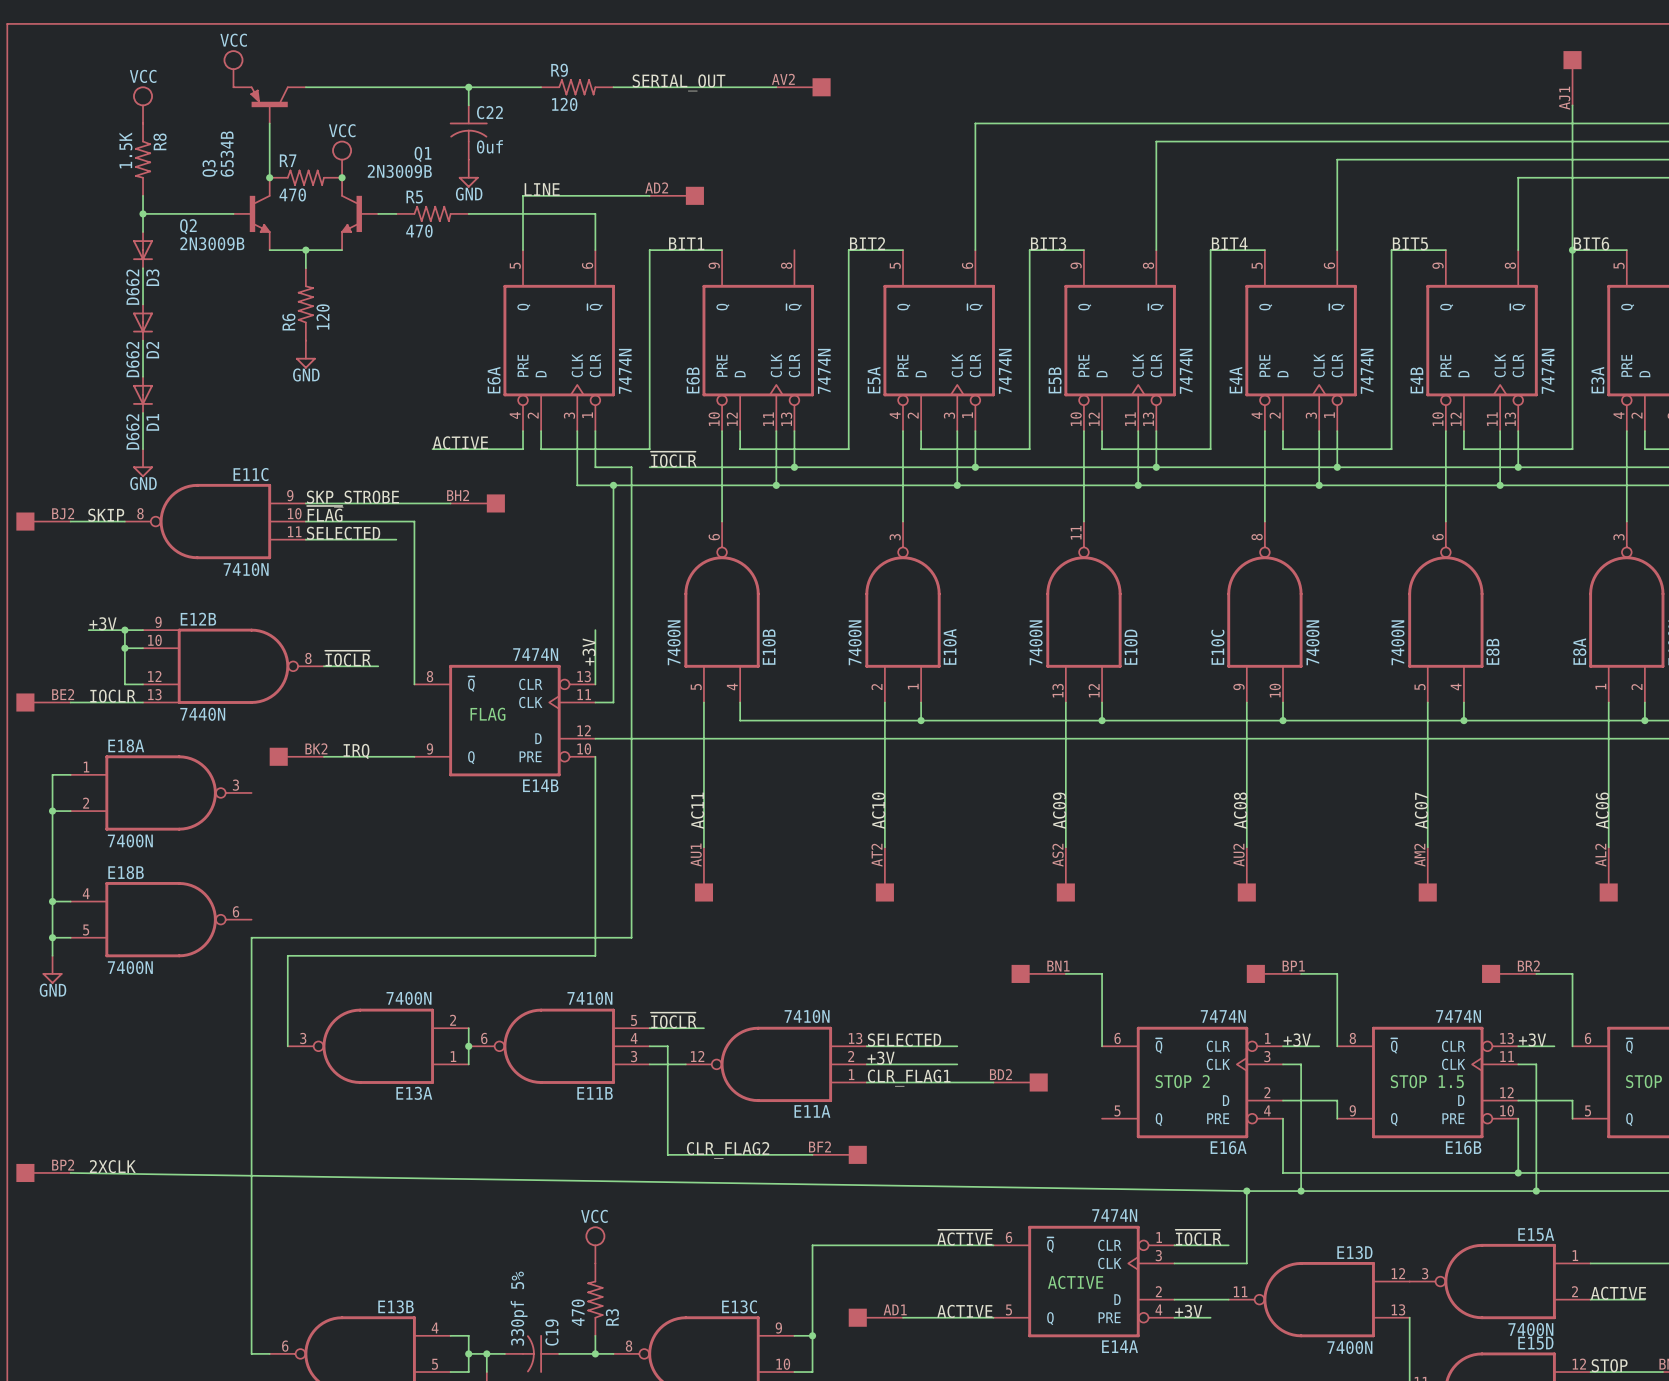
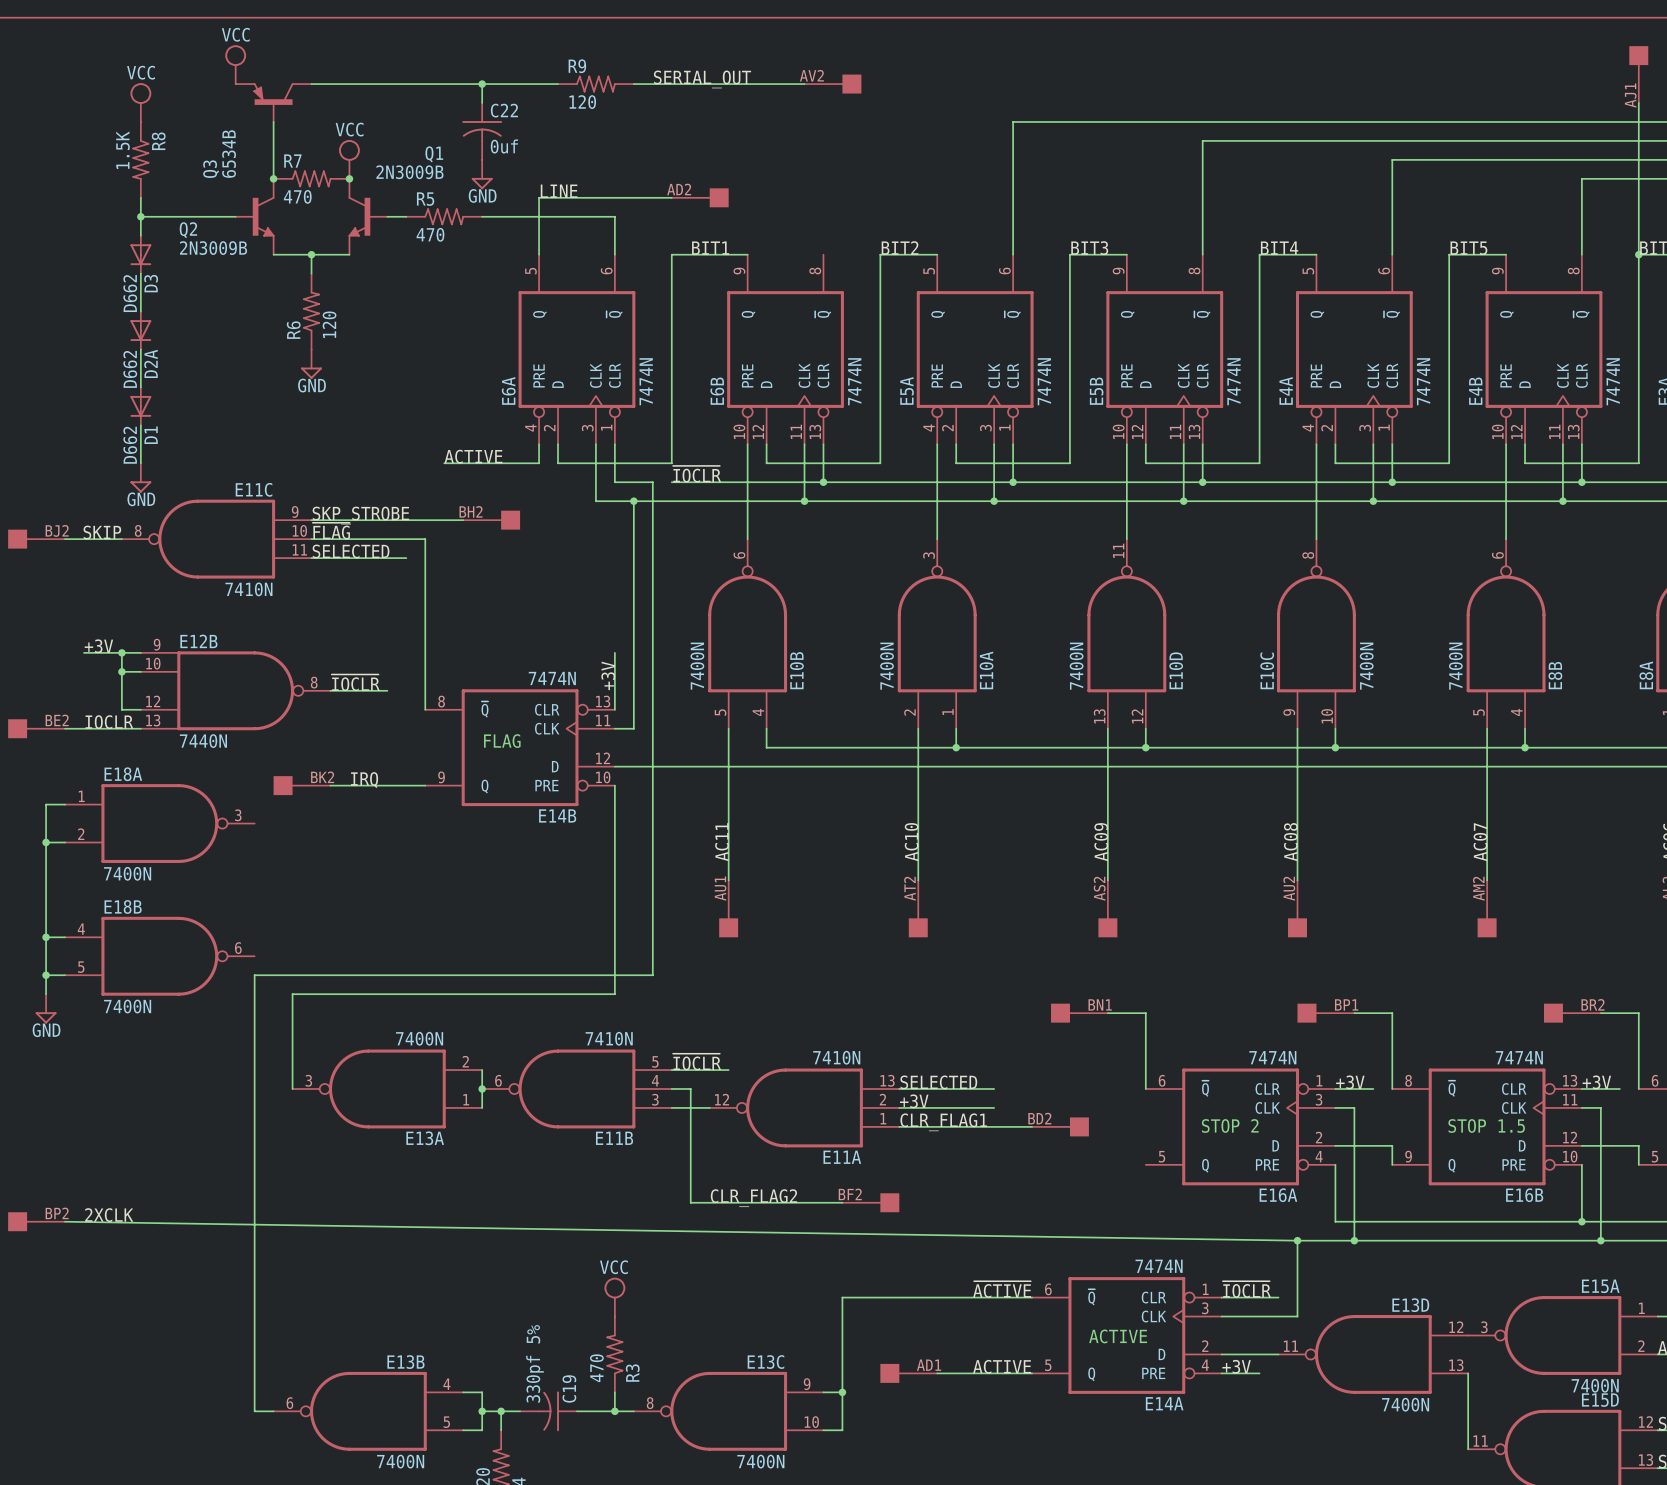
D2 name: D2 (152, 350) -> D2A (150, 363)

